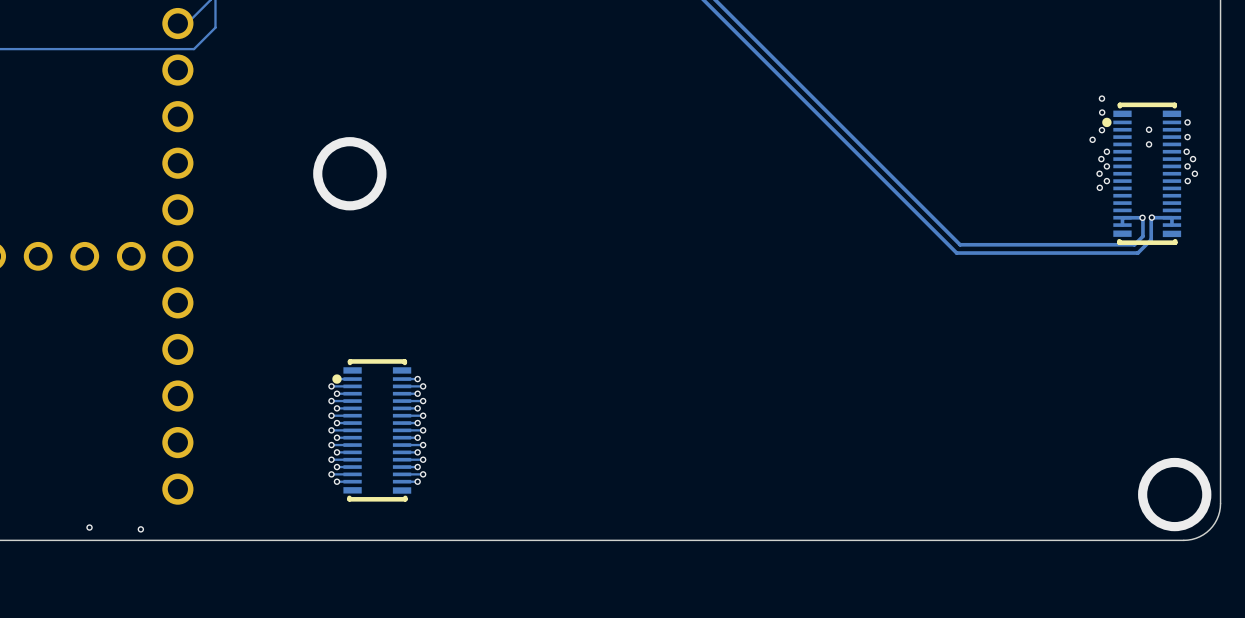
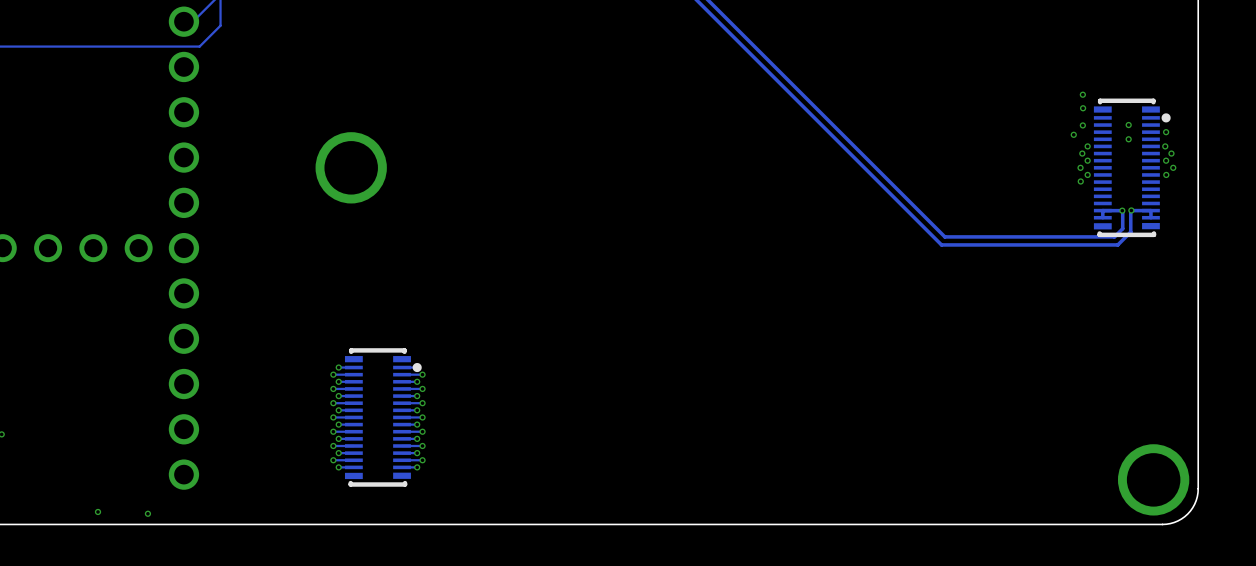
part footprint: [1102, 102, 1182, 245] -> [1093, 98, 1171, 238]
part footprint: [332, 359, 412, 502] -> [344, 348, 422, 487]

